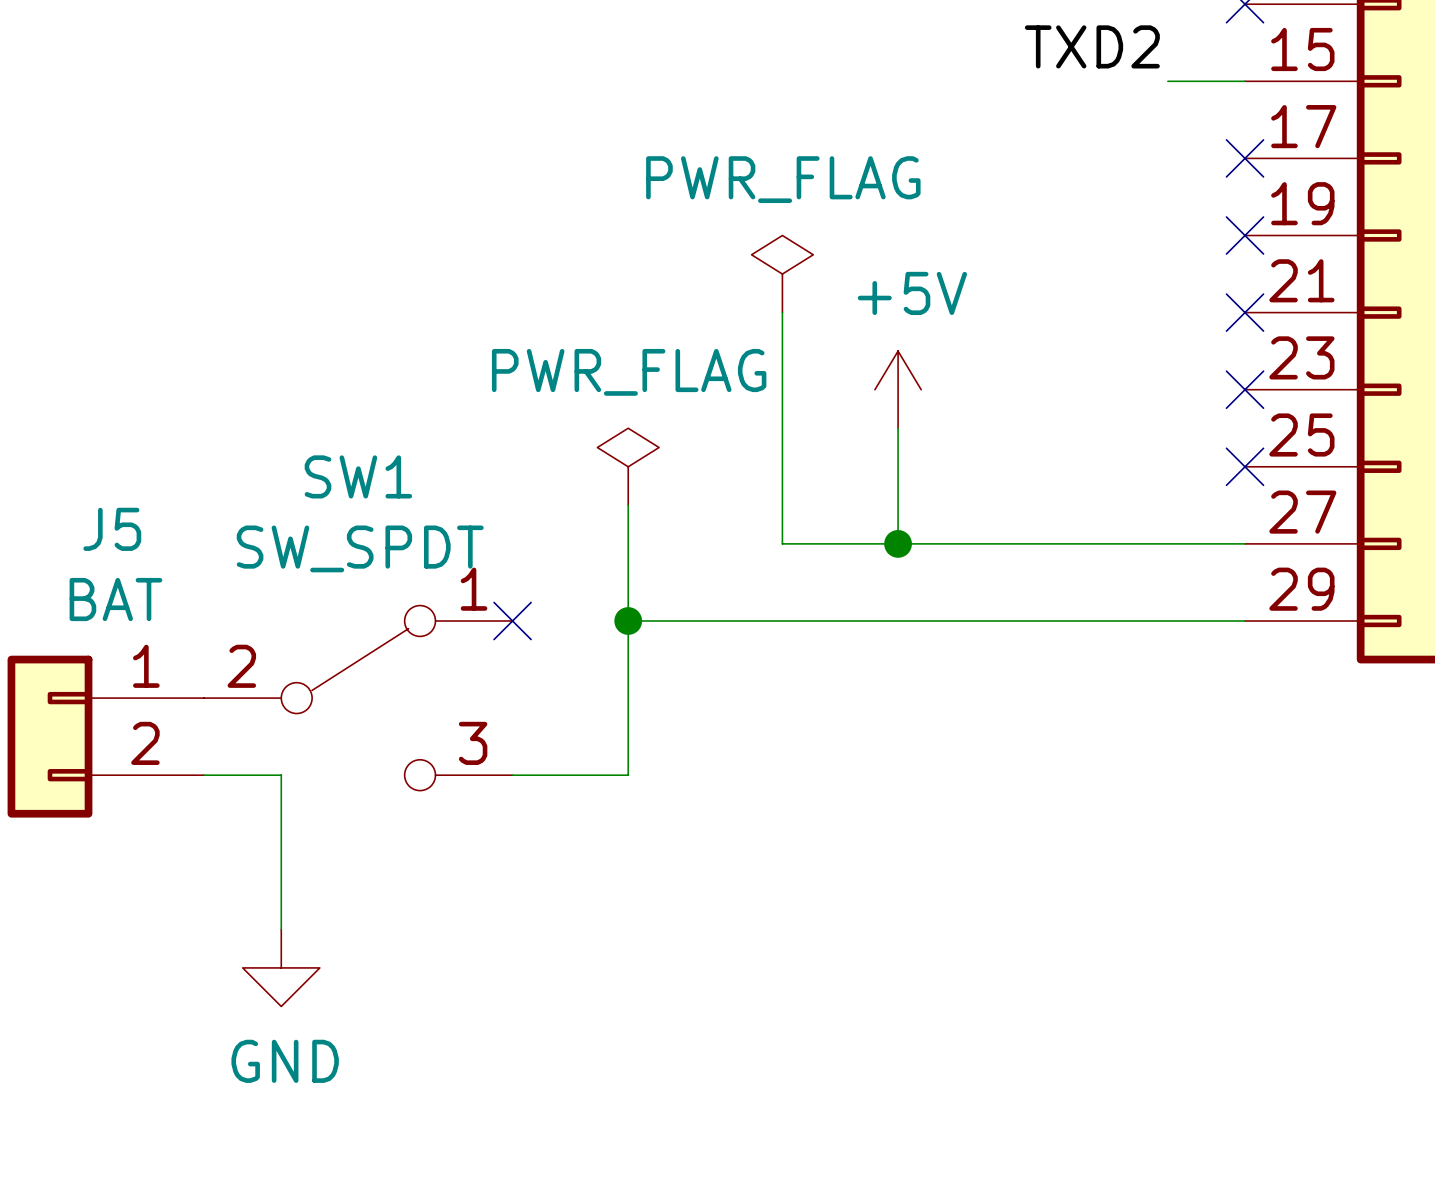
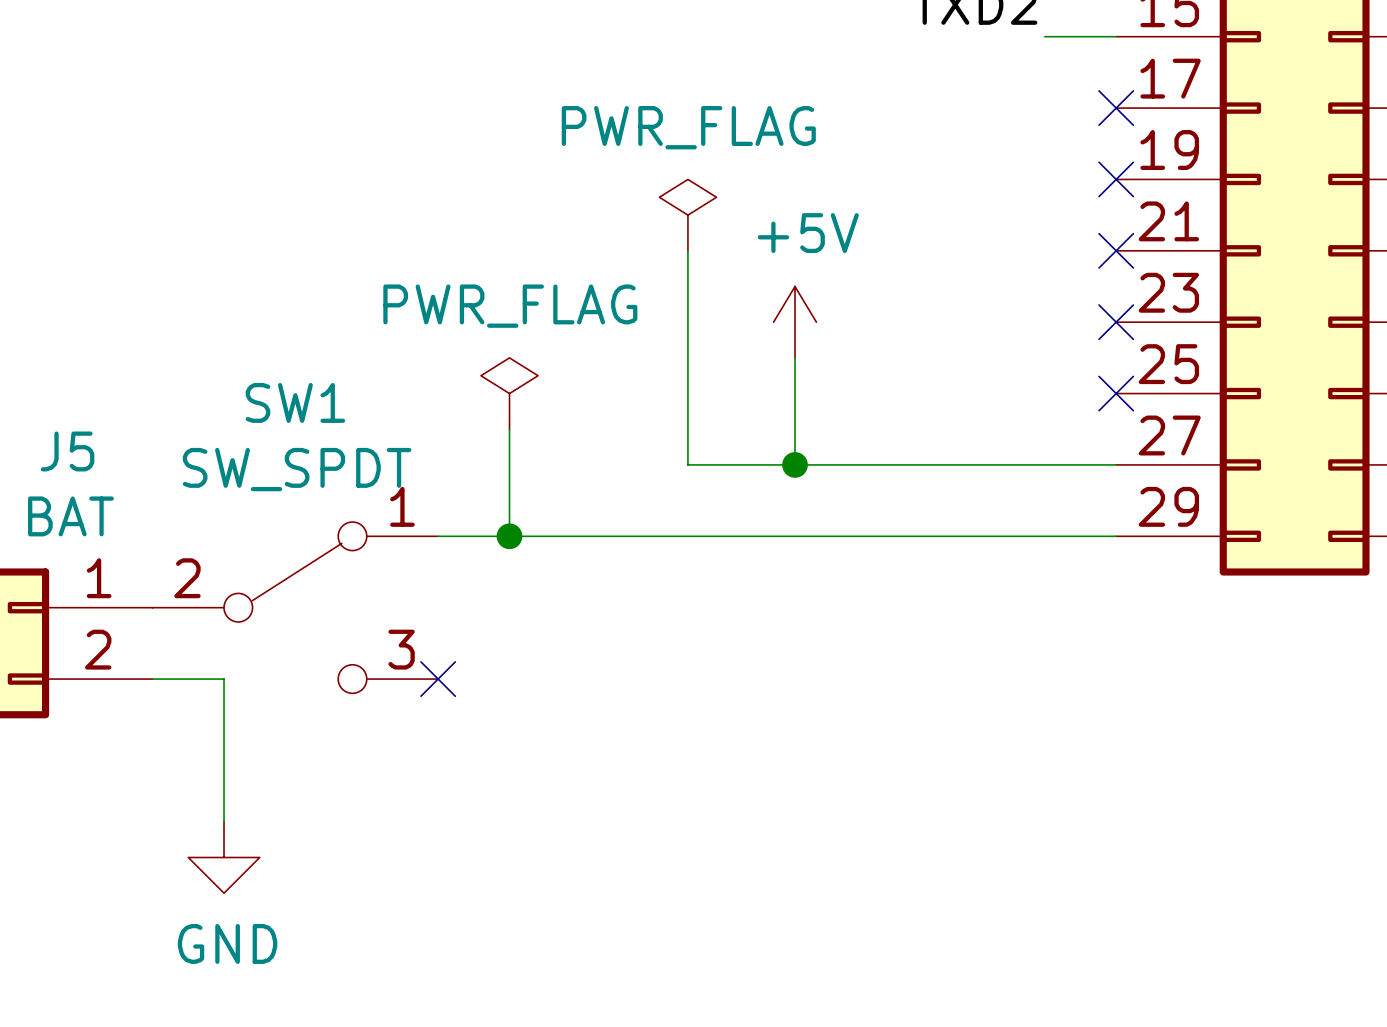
power symbol position: PWR_FLAG (628, 466) -> PWR_FLAG (509, 393)
wire: none -> (509, 429) (509, 536)
wire: (628, 505) (628, 775) (512, 775) -> none
wire: none -> (438, 536) (545, 536)
no-connect mark position: (512, 620) -> (438, 679)
junction position: (628, 620) -> (509, 536)

